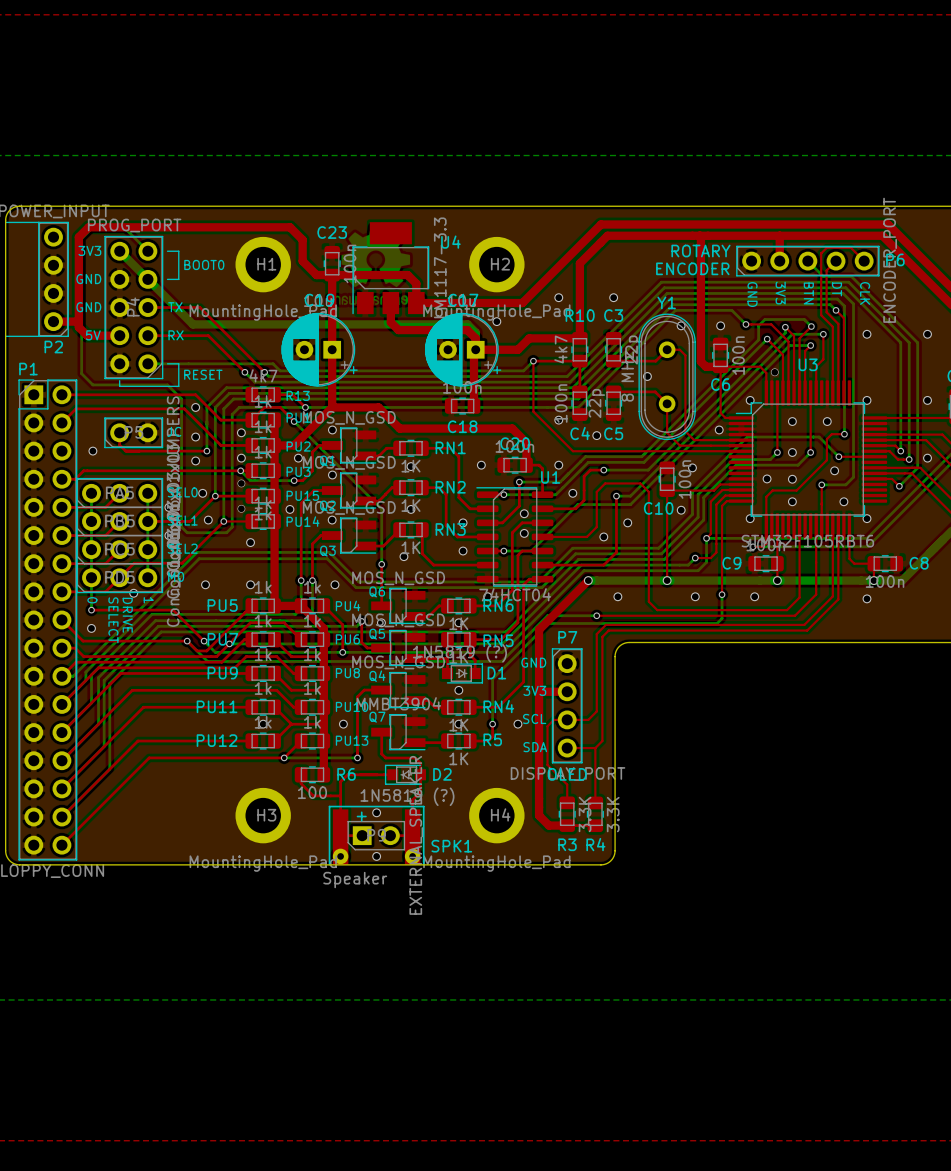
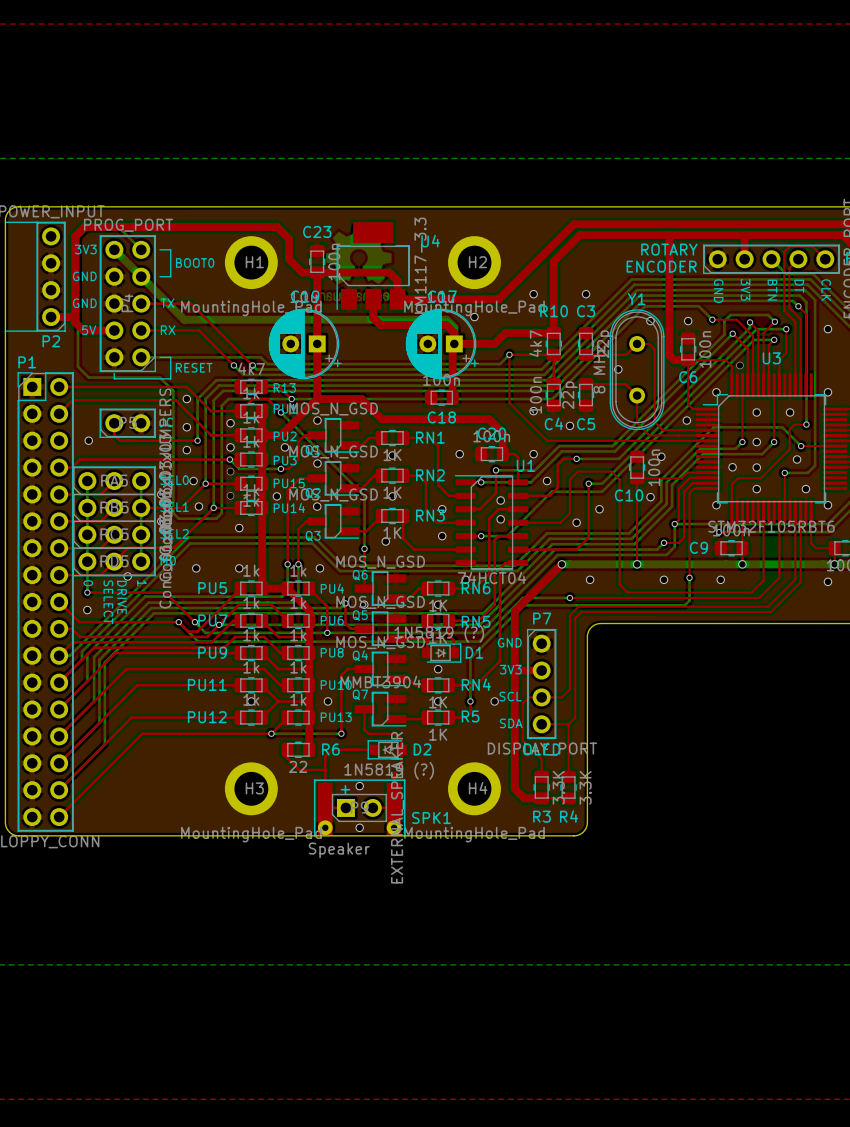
R6 value: 100 (312, 792) -> 22 (298, 766)

